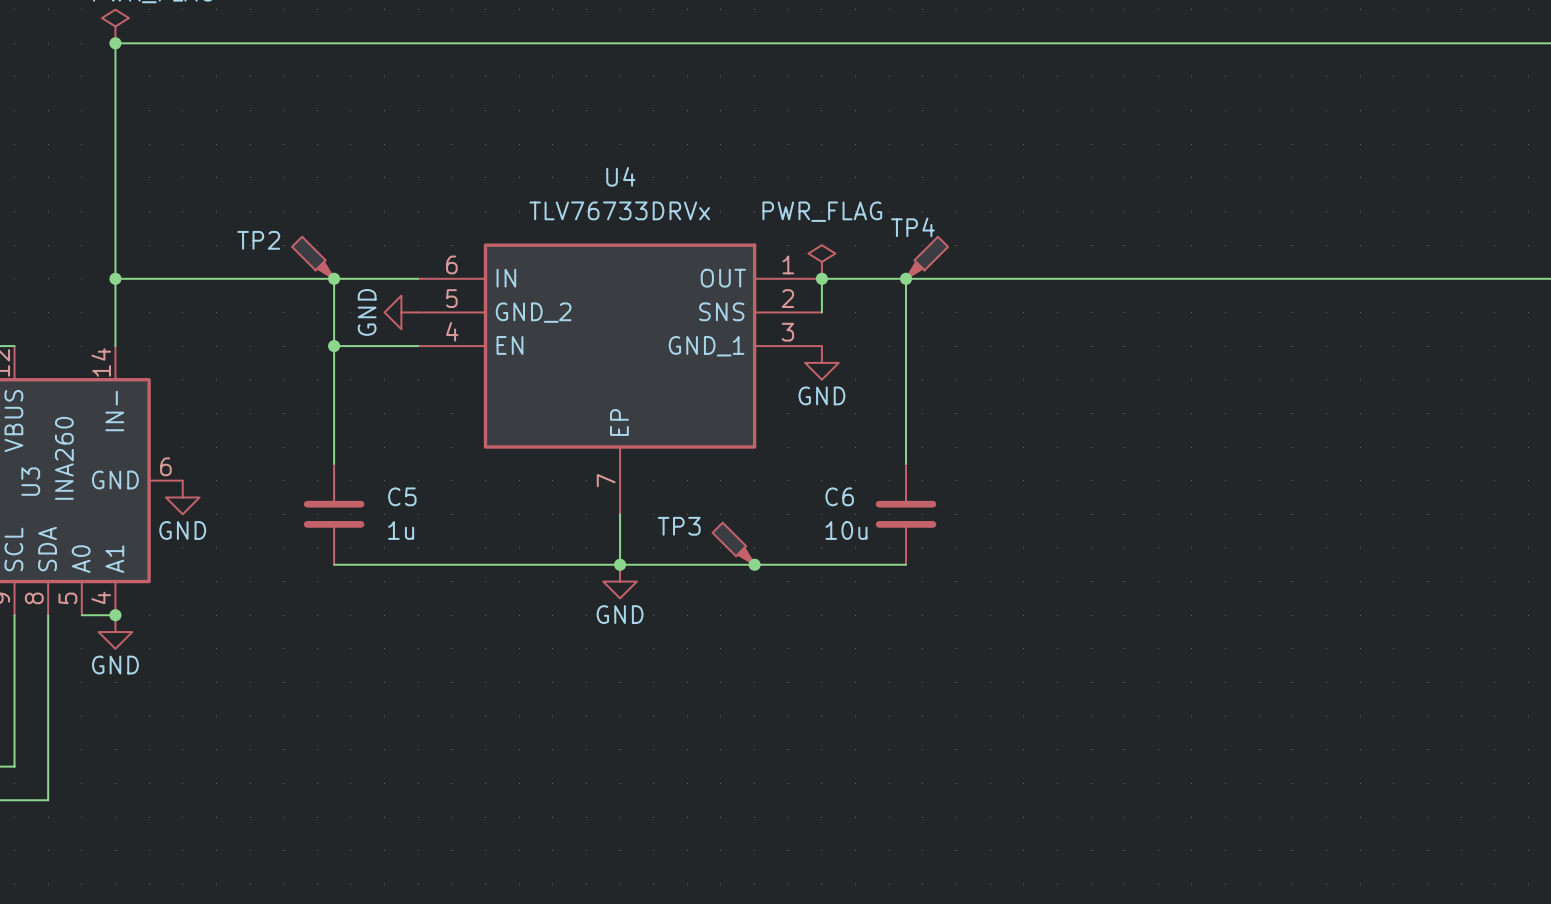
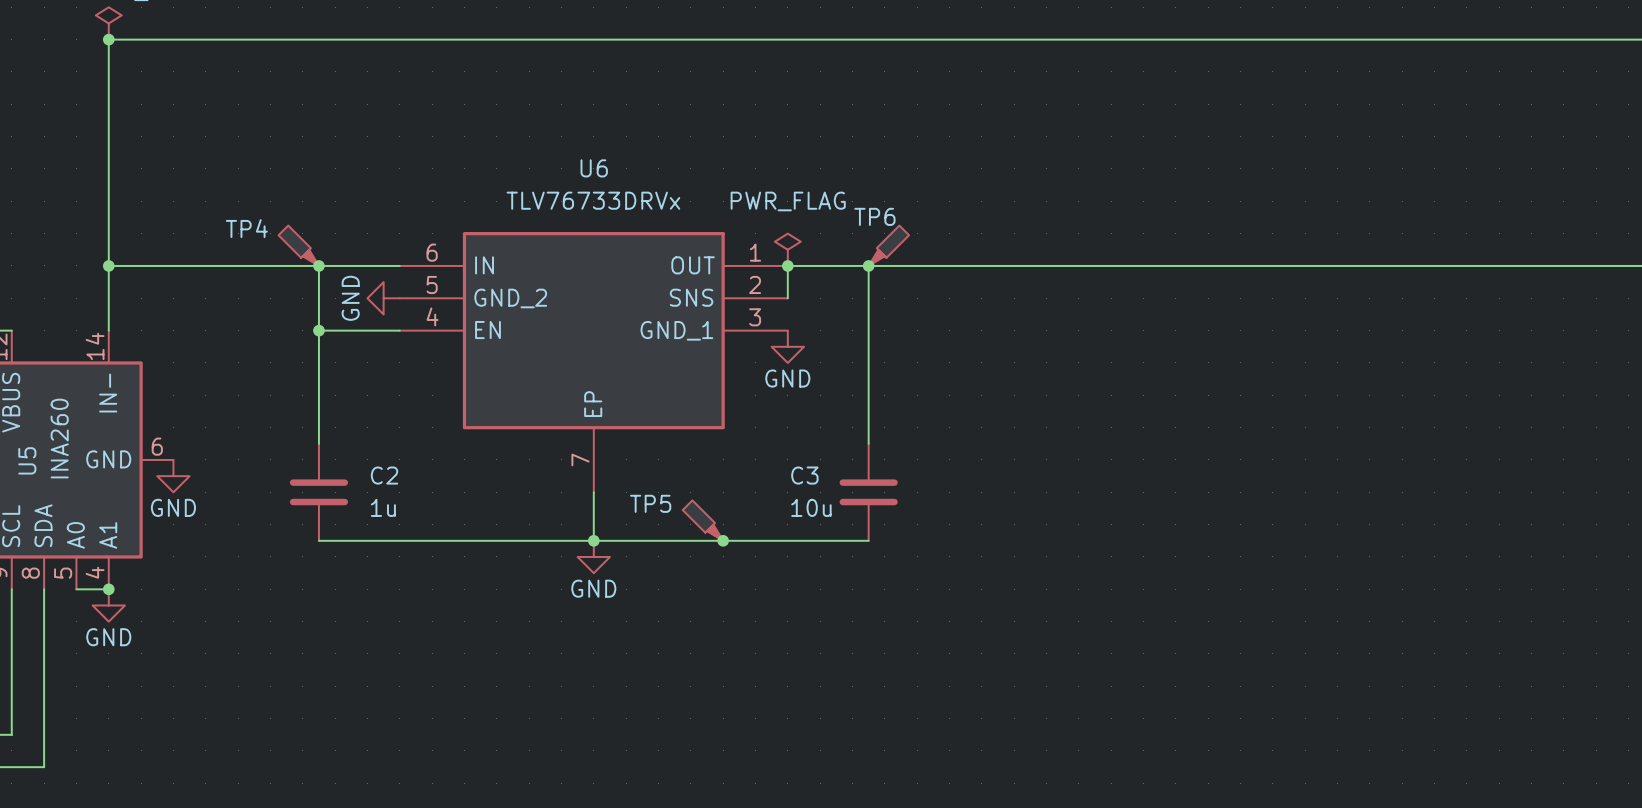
U4 name: U4 (620, 176) -> U6 (594, 168)
TP4 name: TP4 (912, 227) -> TP6 (874, 216)
TP2 name: TP2 (258, 240) -> TP4 (246, 228)
U3 name: U3 (30, 481) -> U5 (27, 460)
C5 name: C5 (402, 496) -> C2 (384, 475)
C6 name: C6 (839, 496) -> C3 (804, 475)
TP3 name: TP3 (679, 526) -> TP5 (650, 503)

